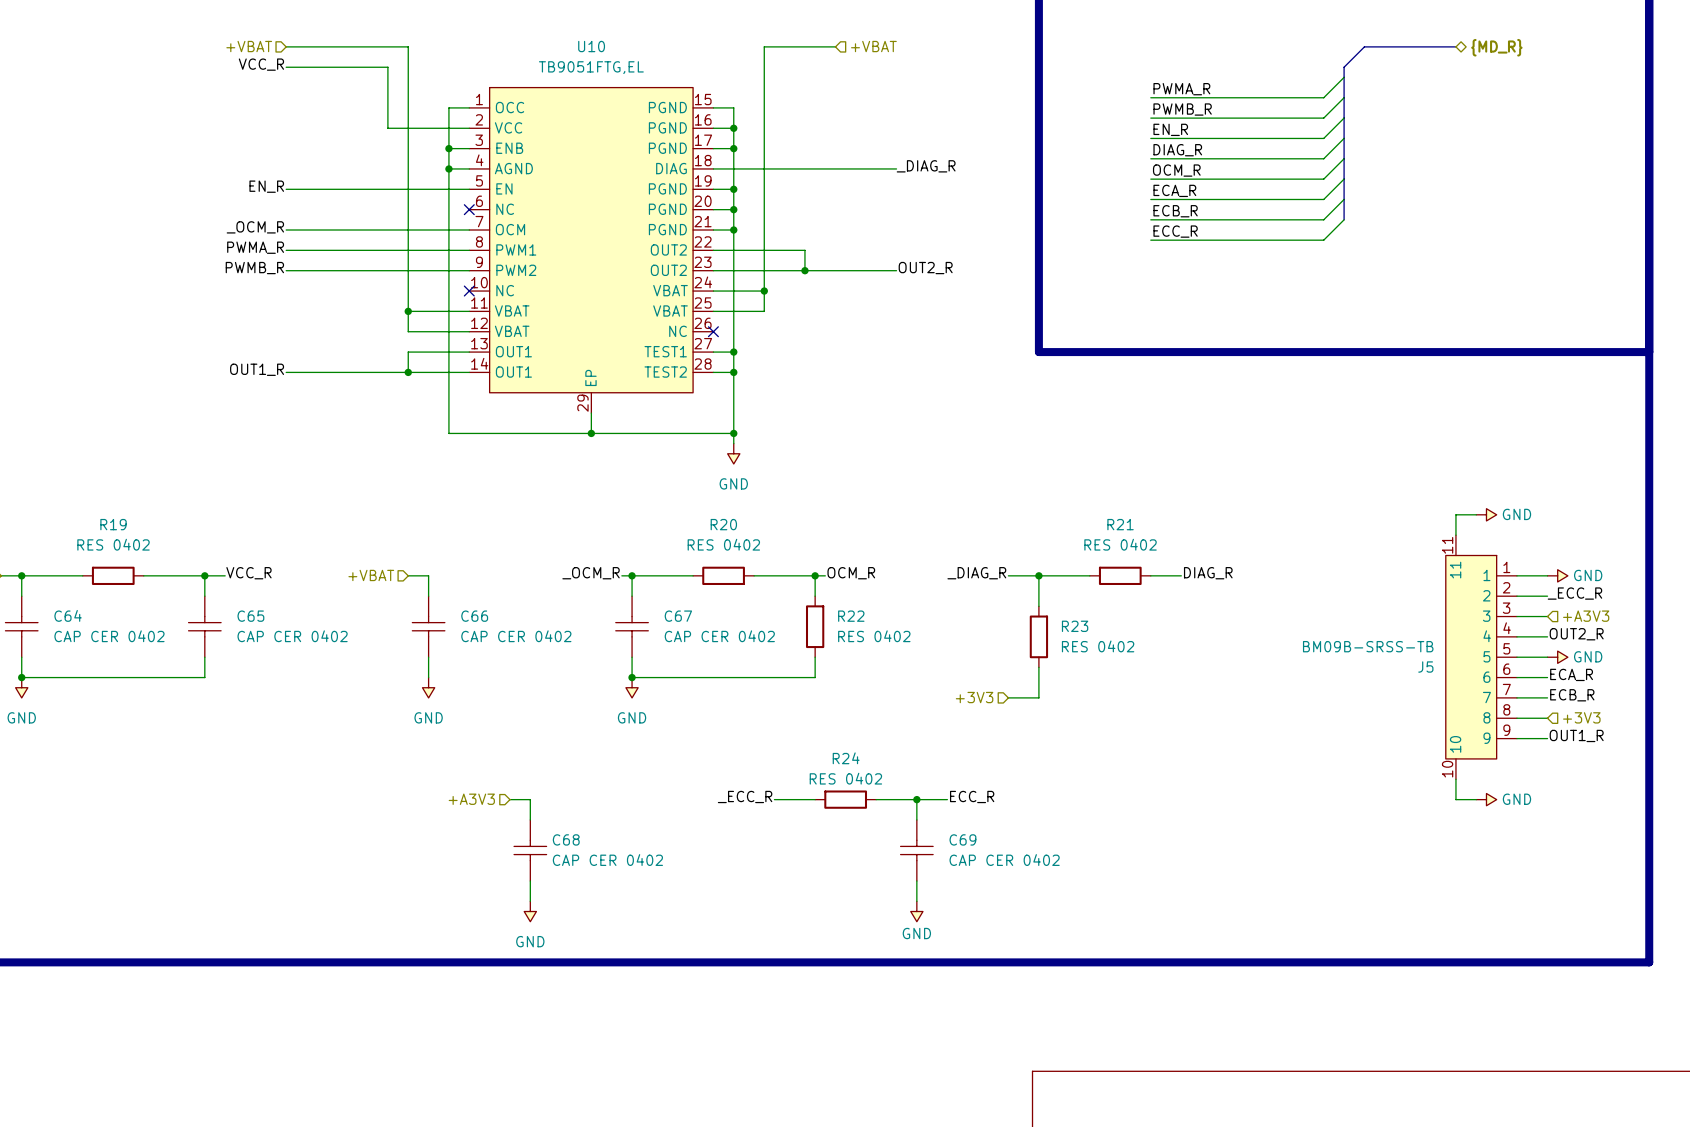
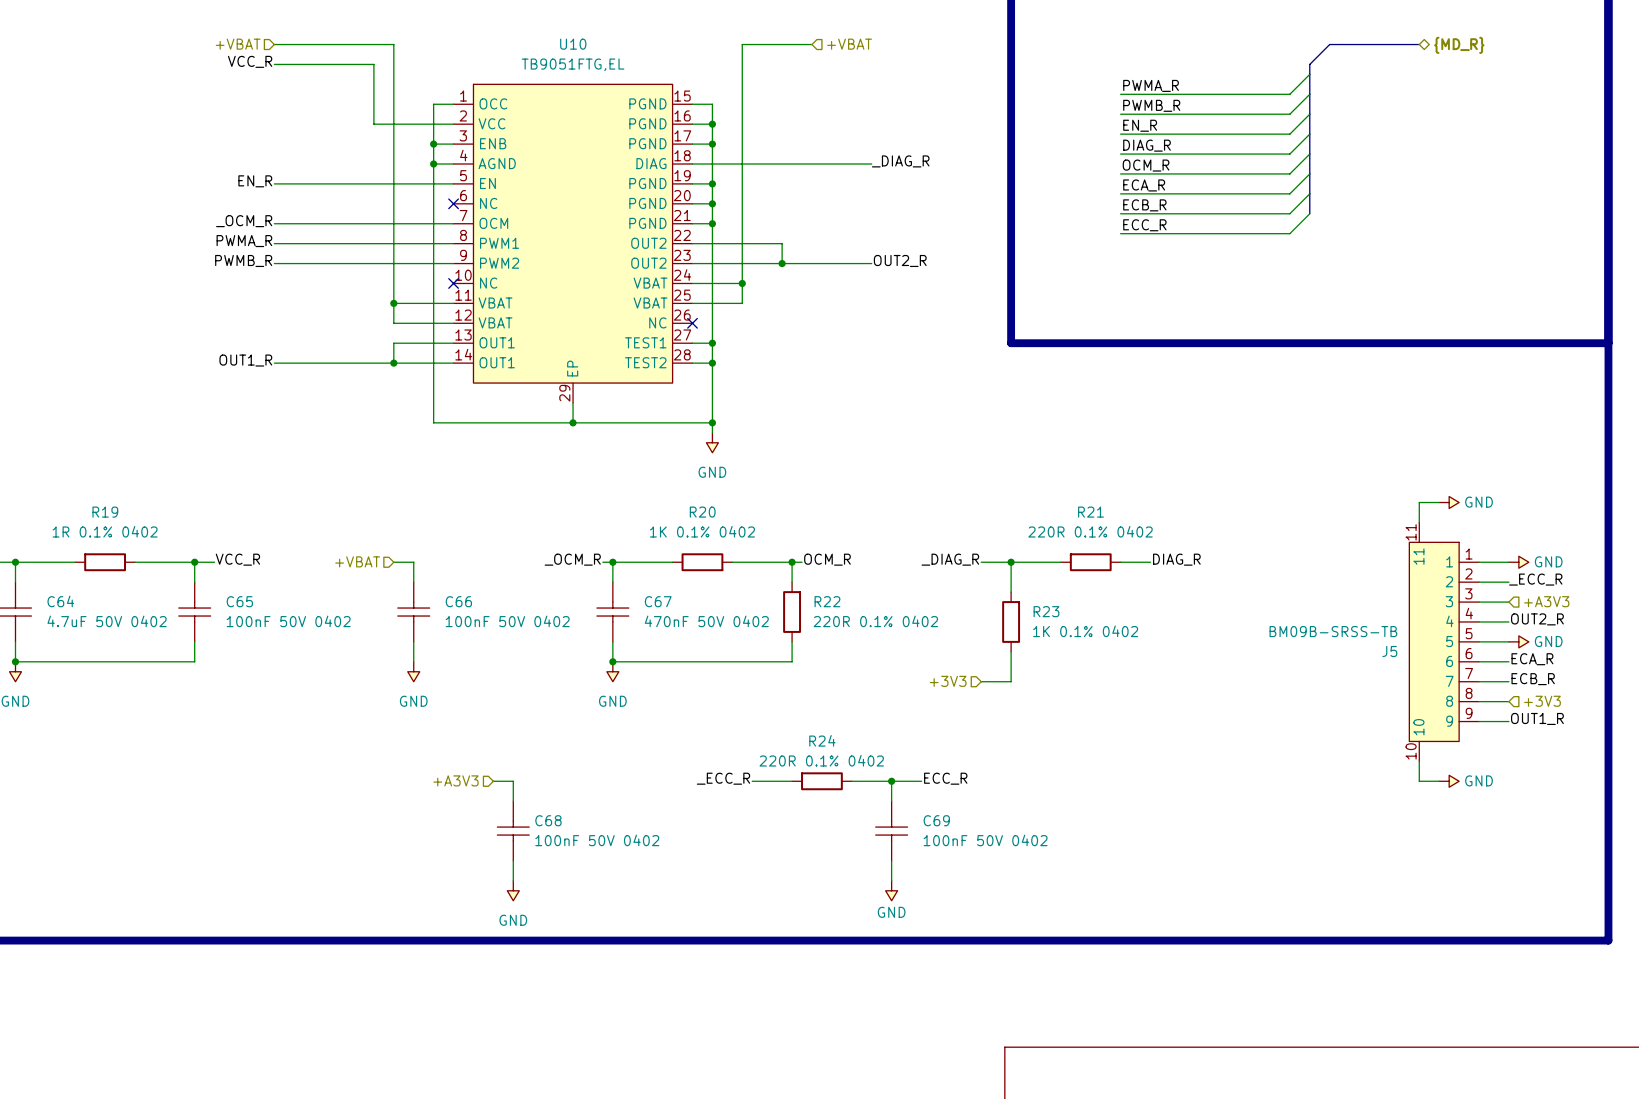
R19 value: RES 0402 (113, 544) -> 1R 0.1% 0402 (105, 531)
R20 value: RES 0402 (723, 544) -> 1K 0.1% 0402 (702, 531)
R21 value: RES 0402 (1120, 544) -> 220R 0.1% 0402 (1090, 531)
C64 value: CAP CER 0402 (109, 636) -> 4.7uF 50V 0402 (107, 621)
C65 value: CAP CER 0402 (292, 636) -> 100nF 50V 0402 (288, 621)
C66 value: CAP CER 0402 (516, 636) -> 100nF 50V 0402 (507, 621)
C67 value: CAP CER 0402 (719, 636) -> 470nF 50V 0402 (706, 621)
R22 value: RES 0402 (874, 636) -> 220R 0.1% 0402 (875, 621)
R23 value: RES 0402 (1098, 646) -> 1K 0.1% 0402 (1085, 631)
R24 value: RES 0402 (845, 778) -> 220R 0.1% 0402 (821, 760)
C68 value: CAP CER 0402 (607, 860) -> 100nF 50V 0402 (597, 840)
C69 value: CAP CER 0402 (1004, 860) -> 100nF 50V 0402 (985, 840)

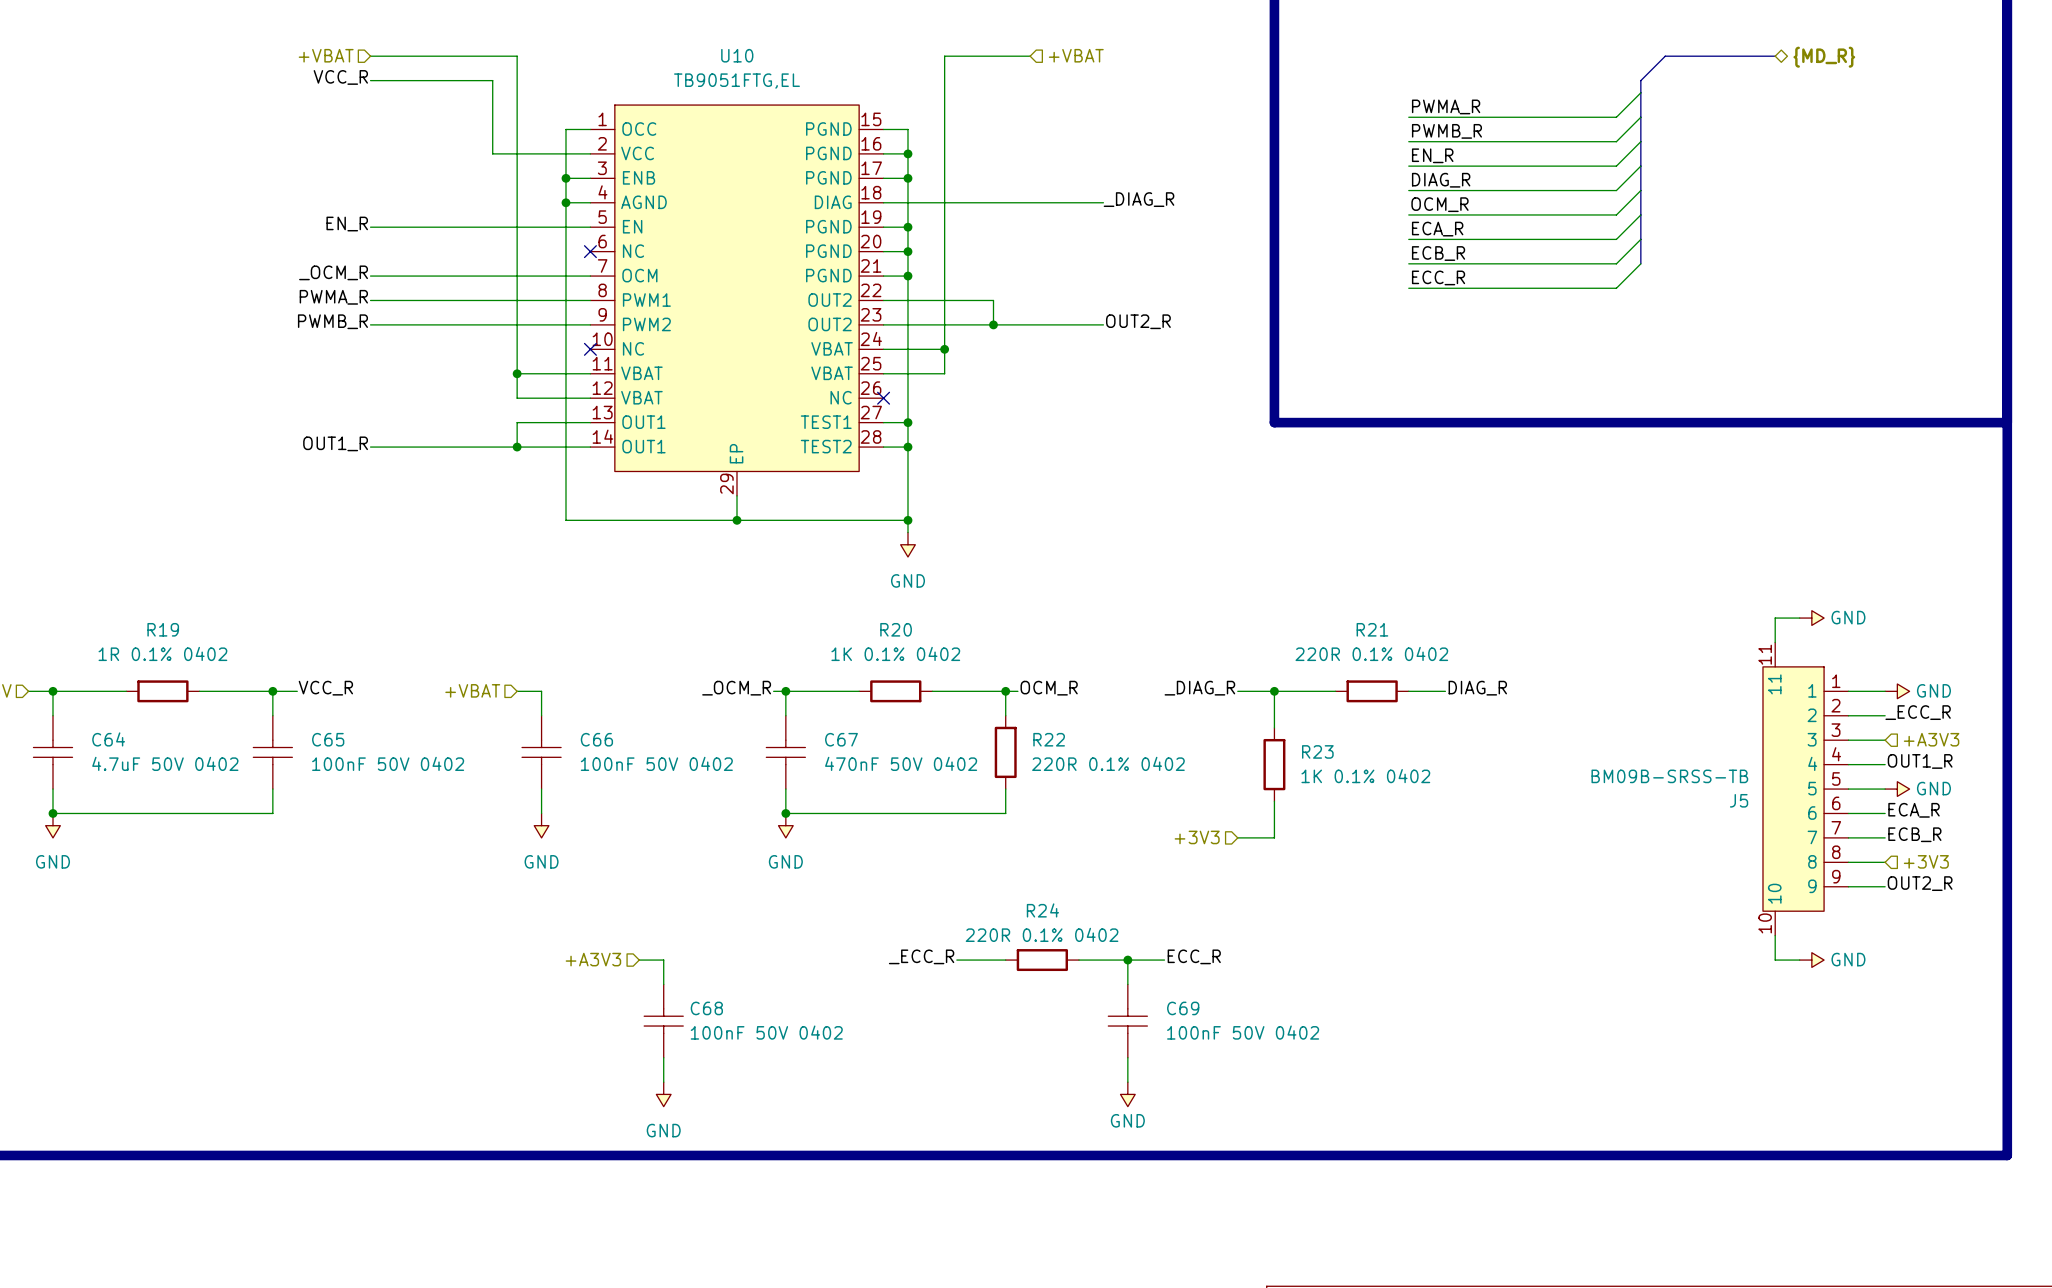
label: OUT2_R (1537, 619) -> OUT1_R (1920, 761)
label: OUT1_R (1537, 718) -> OUT2_R (1920, 883)

